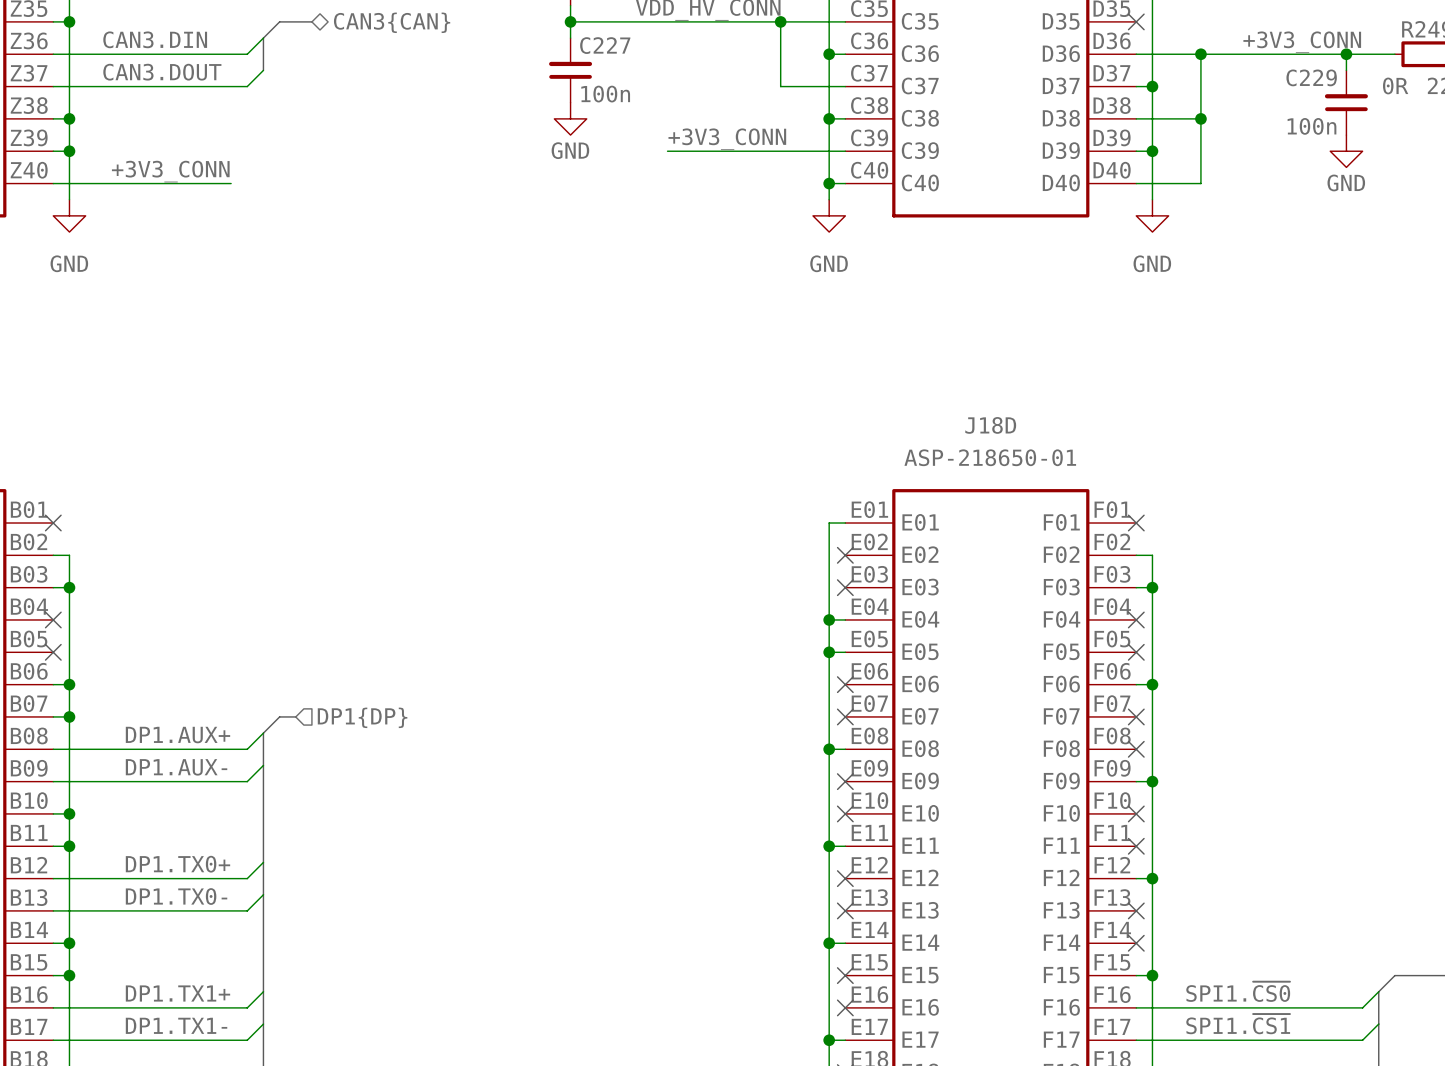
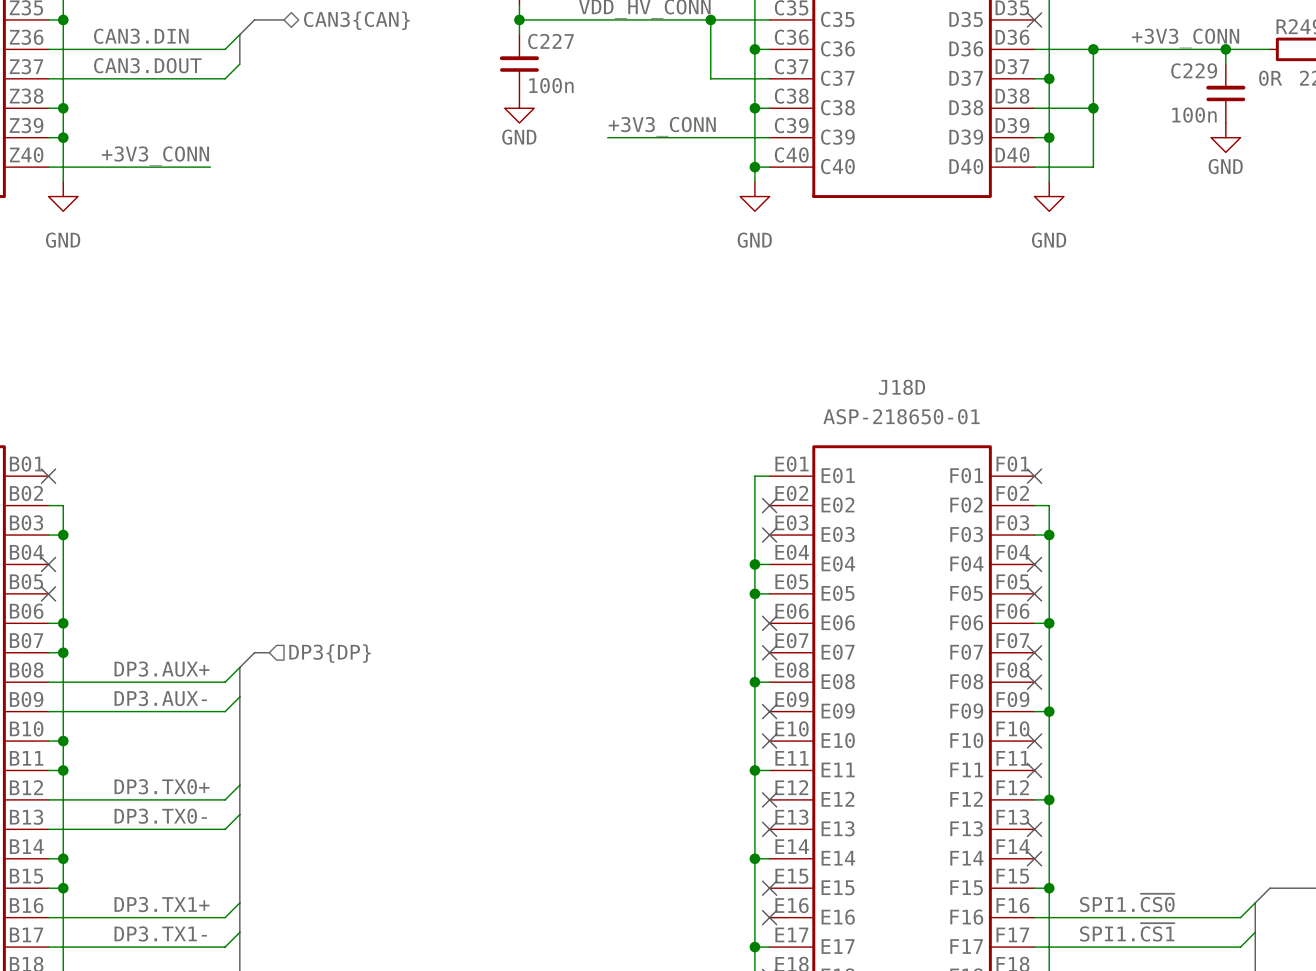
hierarchical label: DP1{DP} (362, 717) -> DP3{DP} (330, 653)
label: DP1.AUX+ (177, 735) -> DP3.AUX+ (162, 669)
label: DP1.AUX- (176, 767) -> DP3.AUX- (160, 698)
label: DP1.TX0+ (177, 864) -> DP3.TX0+ (162, 786)
label: DP1.TX0- (176, 896) -> DP3.TX0- (160, 816)
label: DP1.TX1+ (177, 993) -> DP3.TX1+ (162, 904)
label: DP1.TX1- (176, 1025) -> DP3.TX1- (160, 933)

